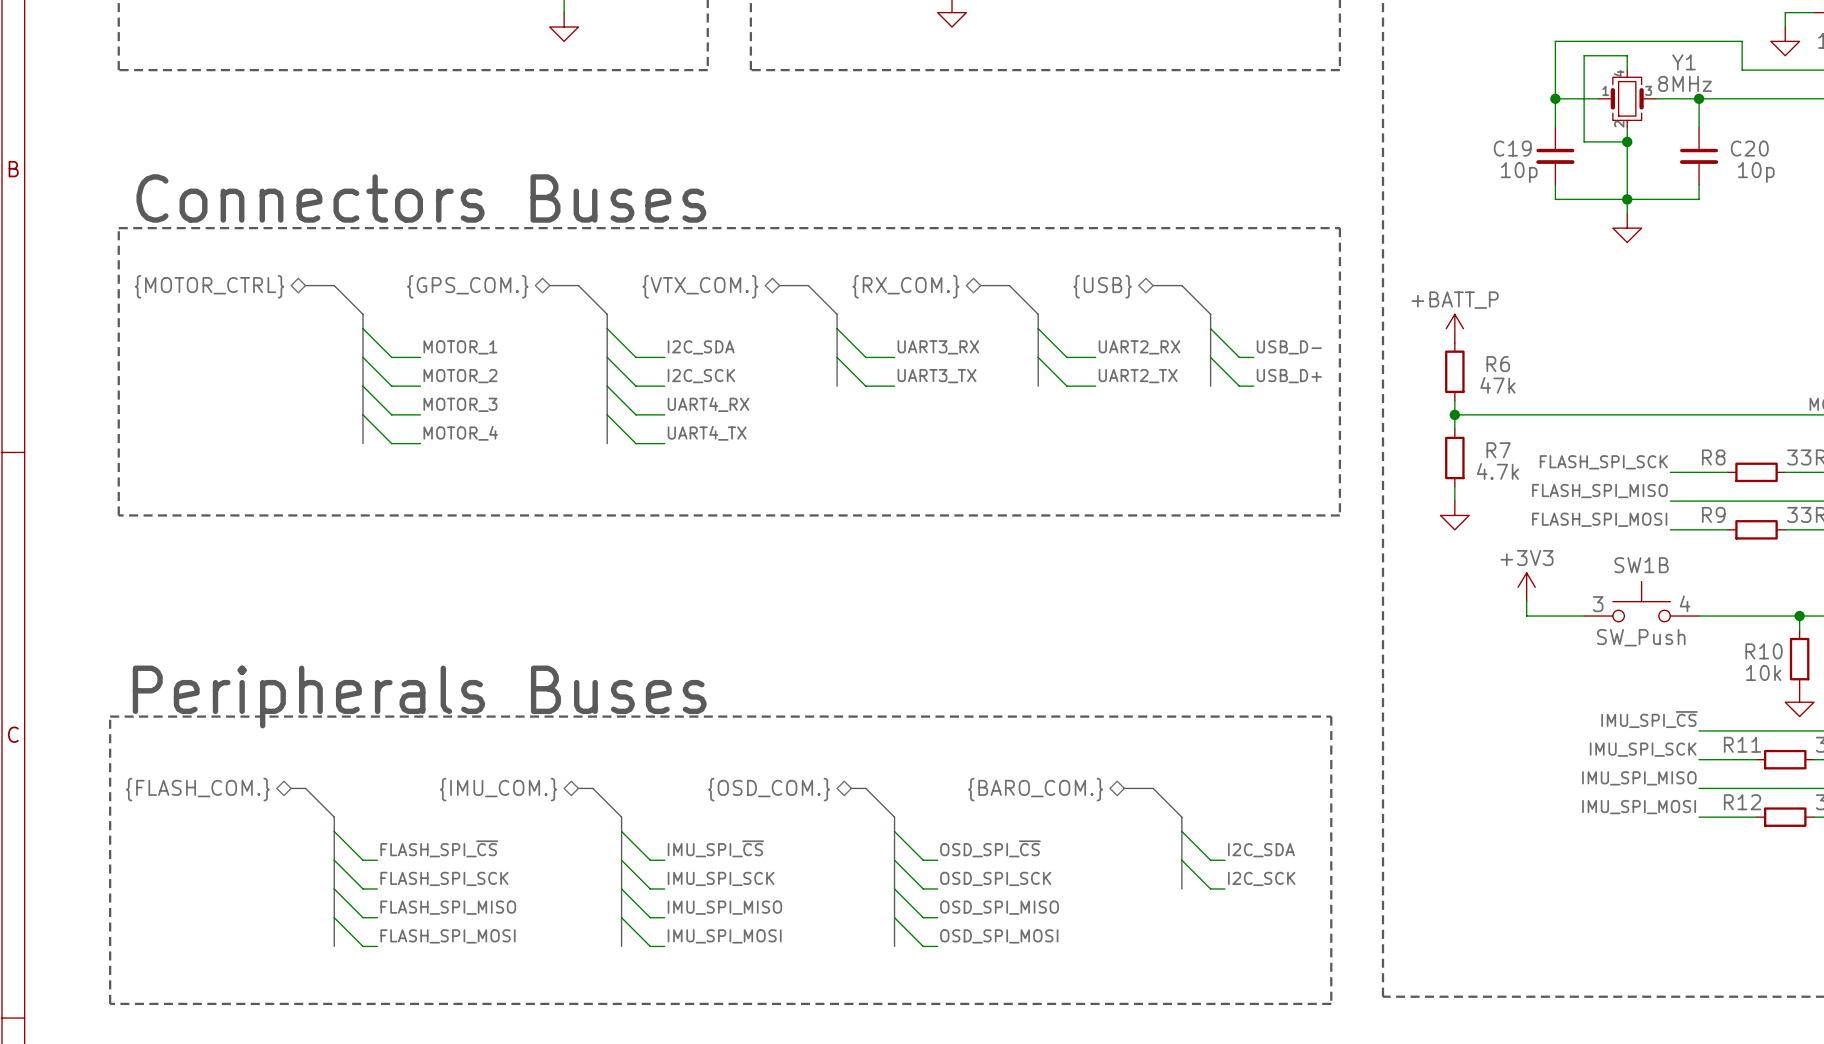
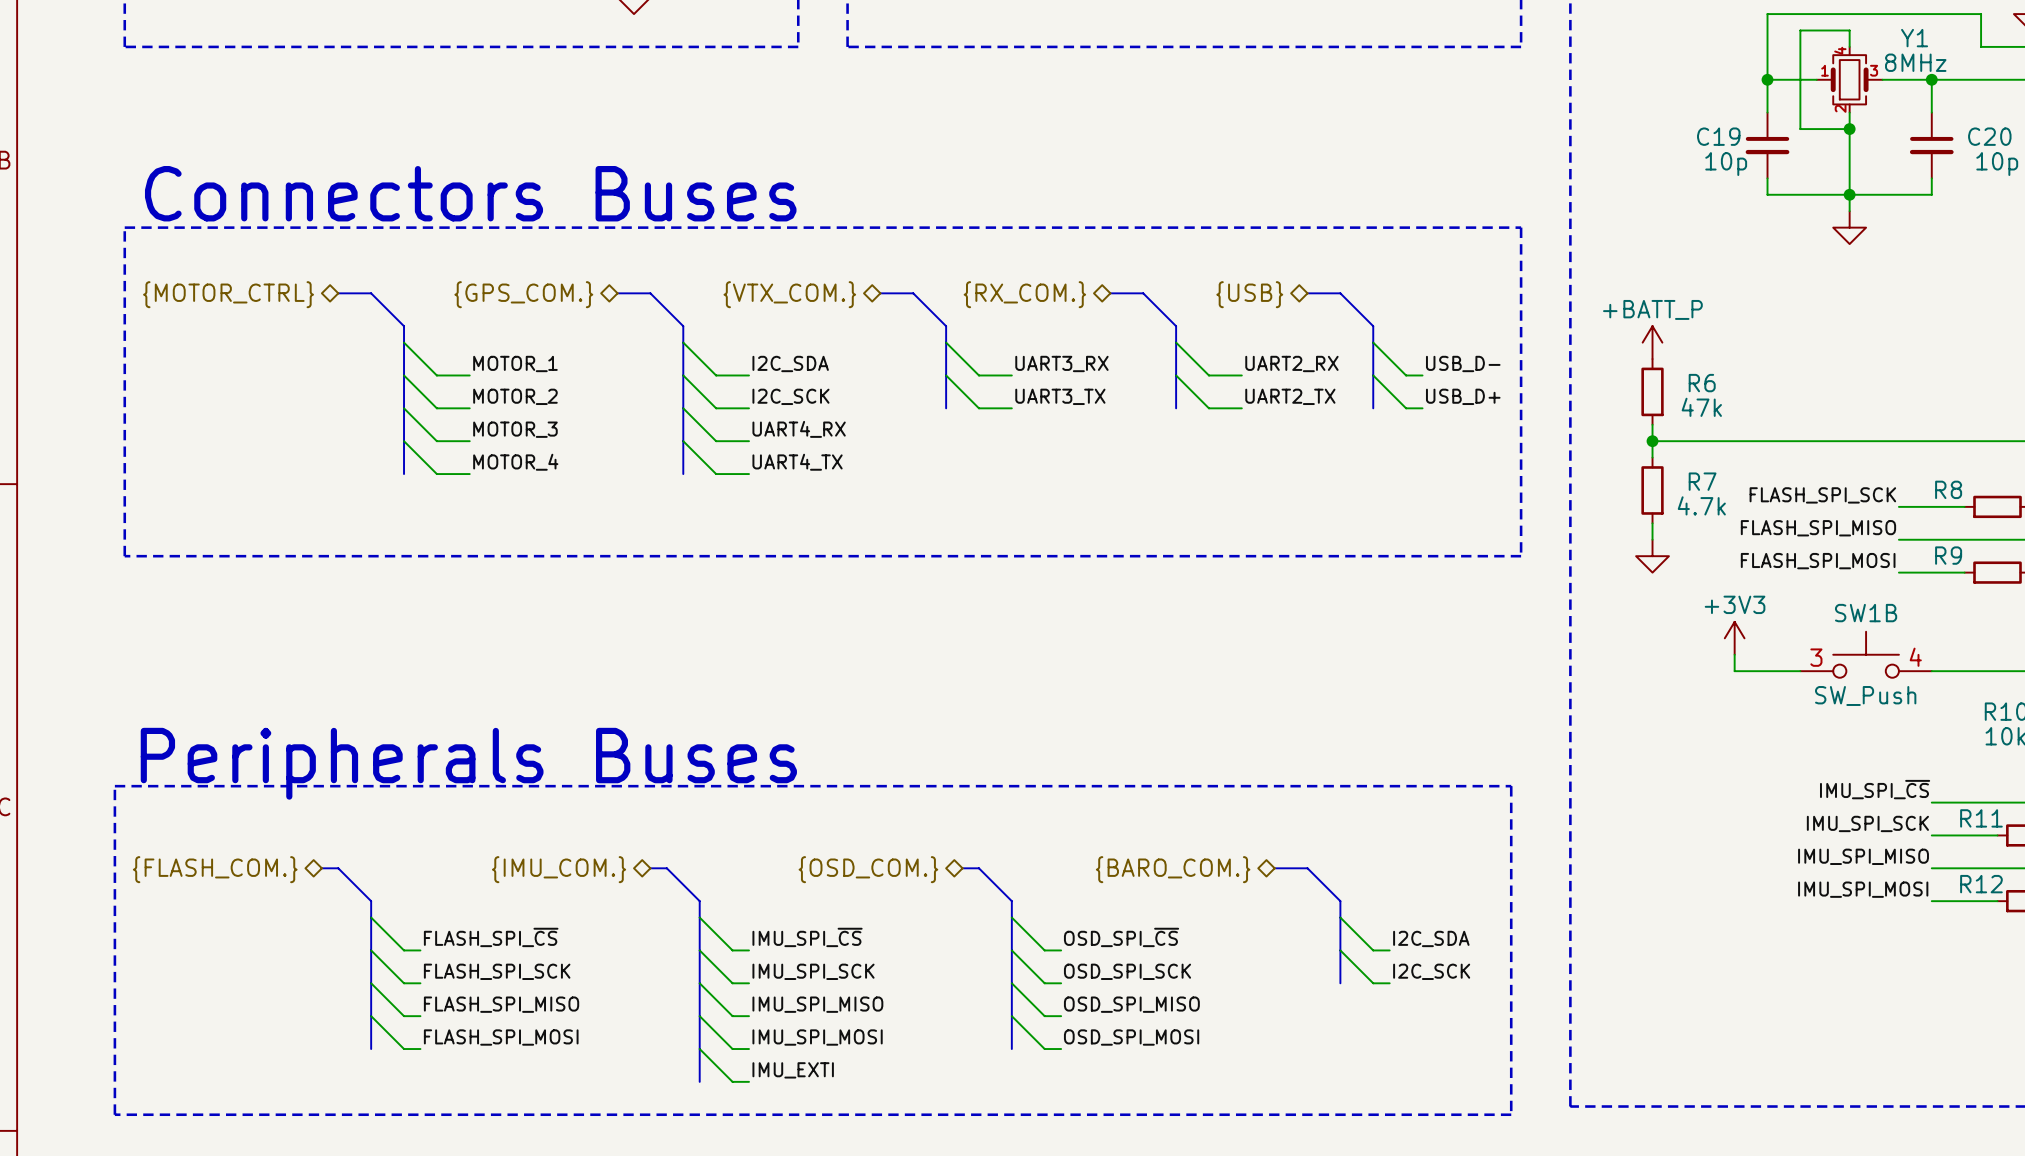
wire: none -> (699, 1049) (732, 1081) (748, 1081)
bus: none -> (699, 1049) (699, 1081)
label: none -> IMU_EXTI (793, 1070)

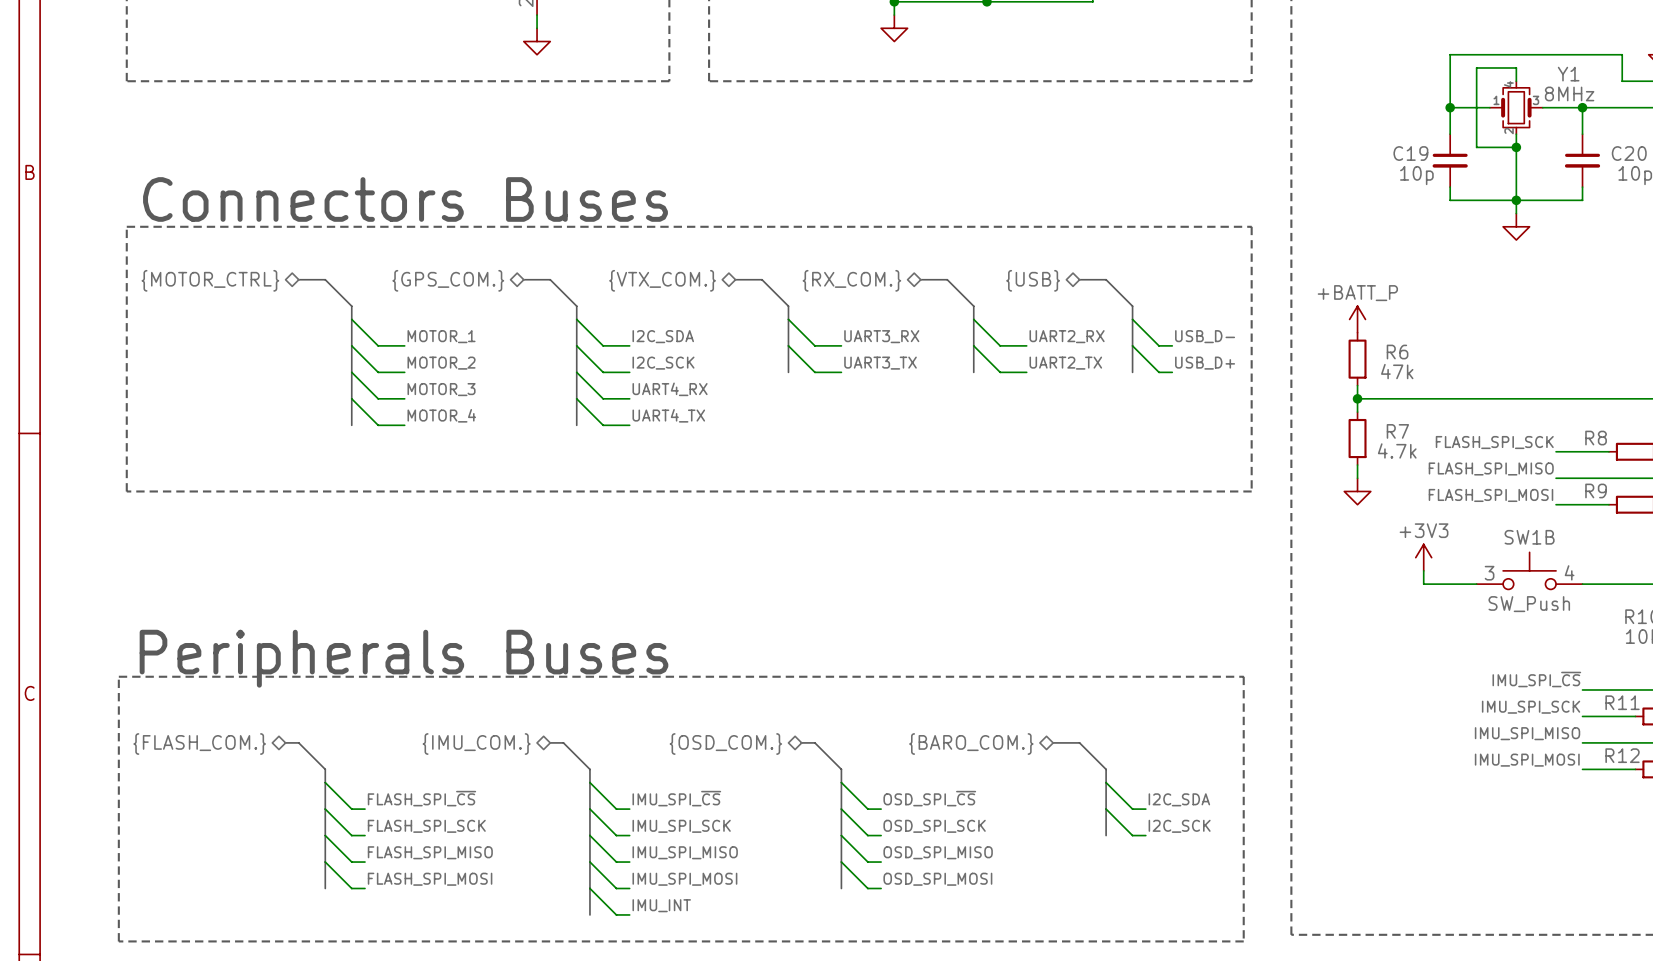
label: IMU_EXTI (793, 1070) -> IMU_INT (661, 905)

